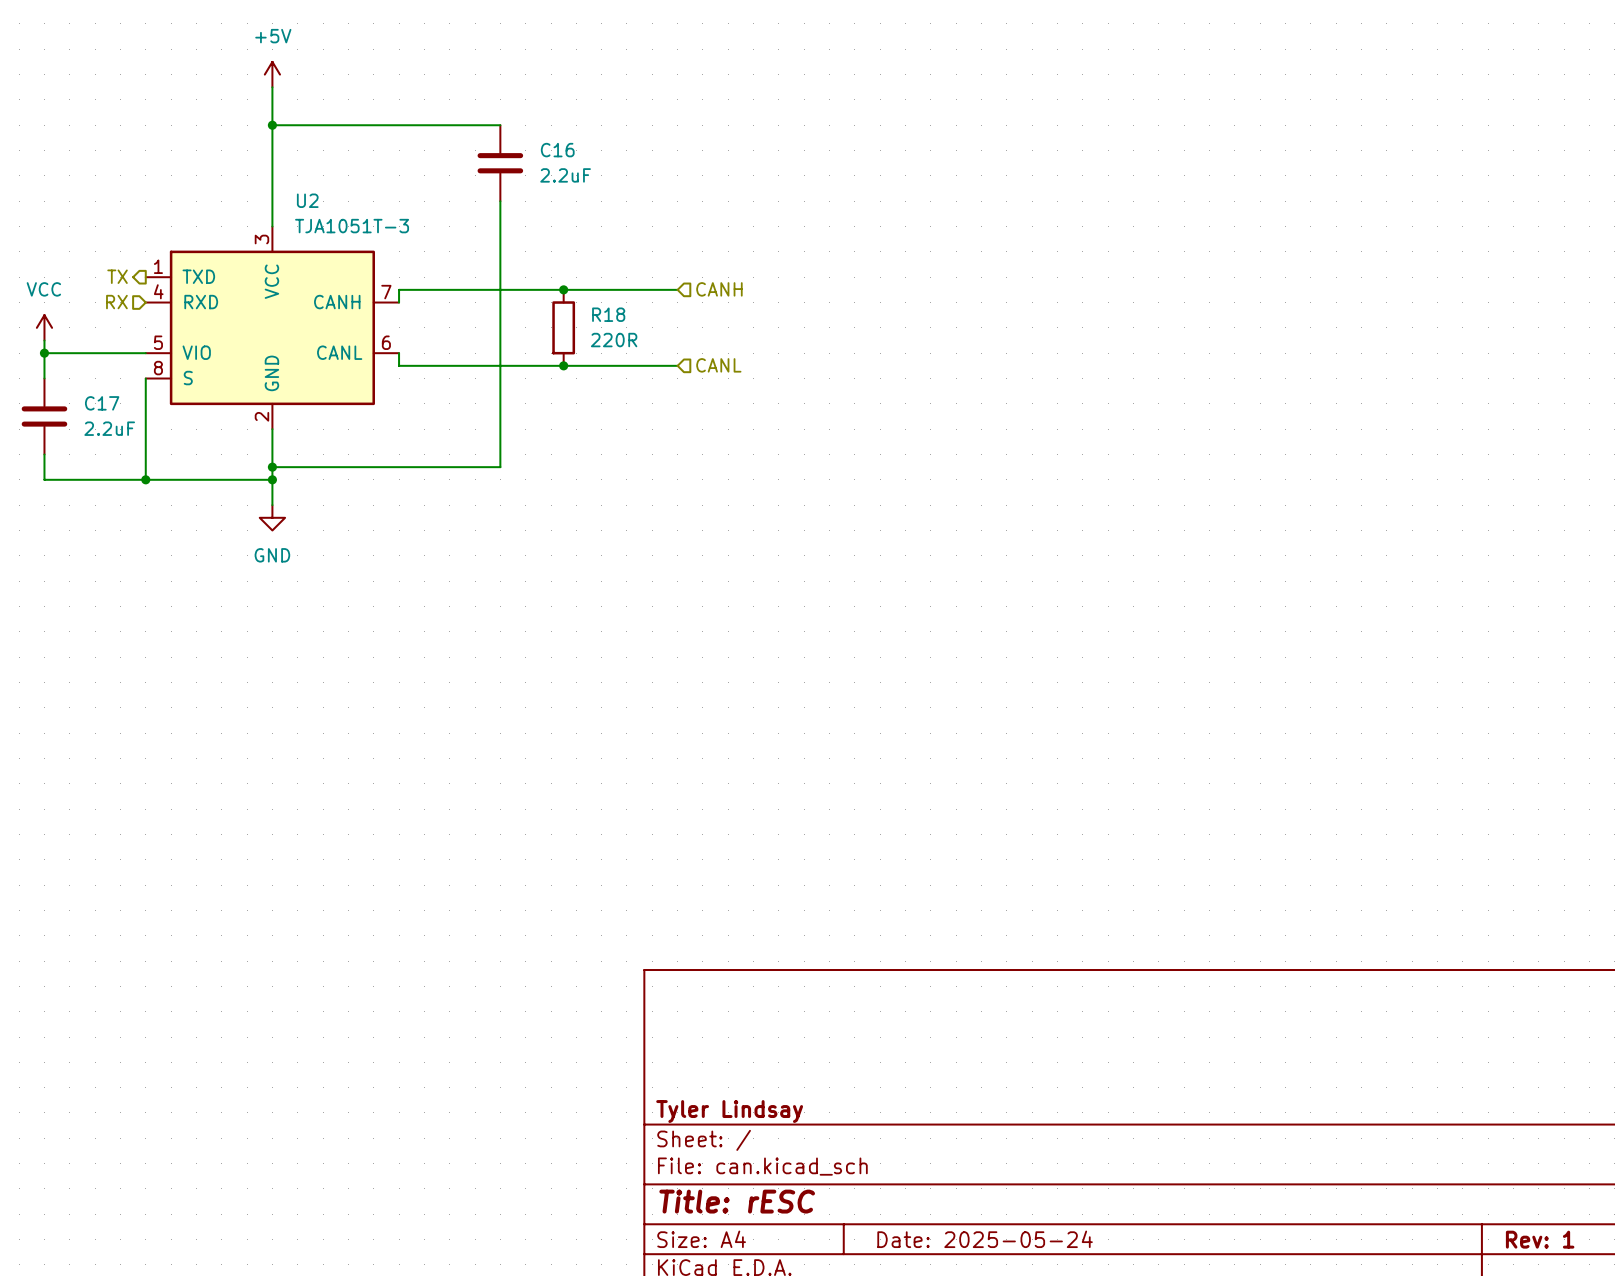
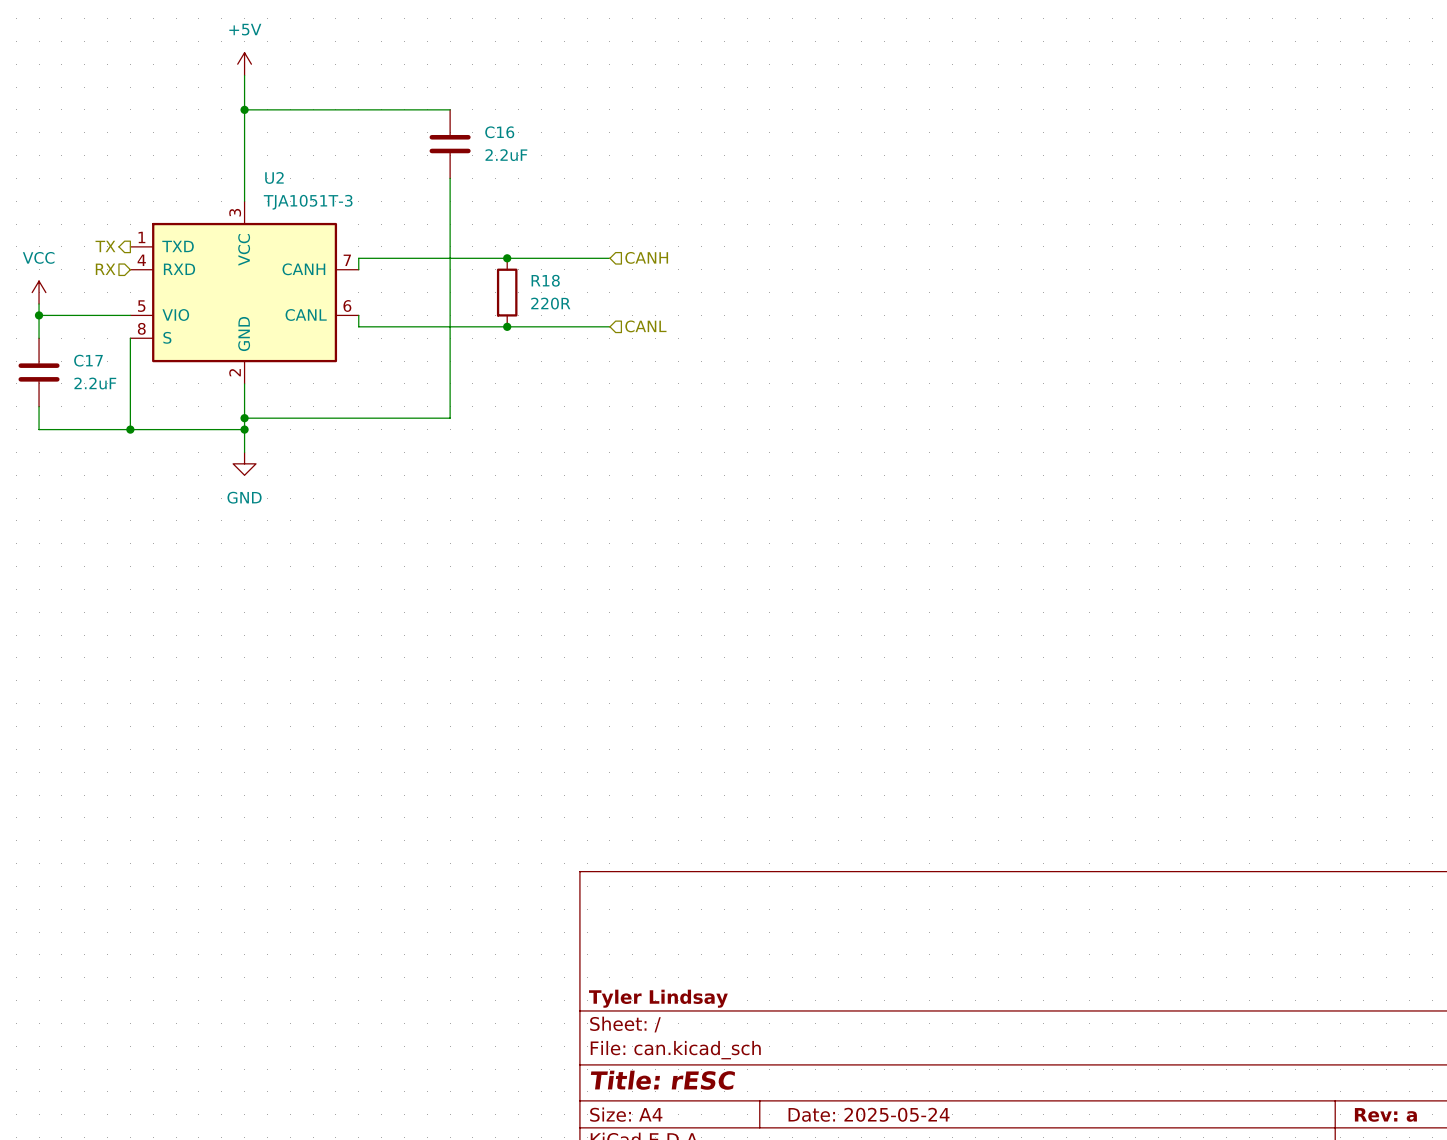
title block: Rev: 1 (1540, 1239) -> Rev: a (1385, 1114)

